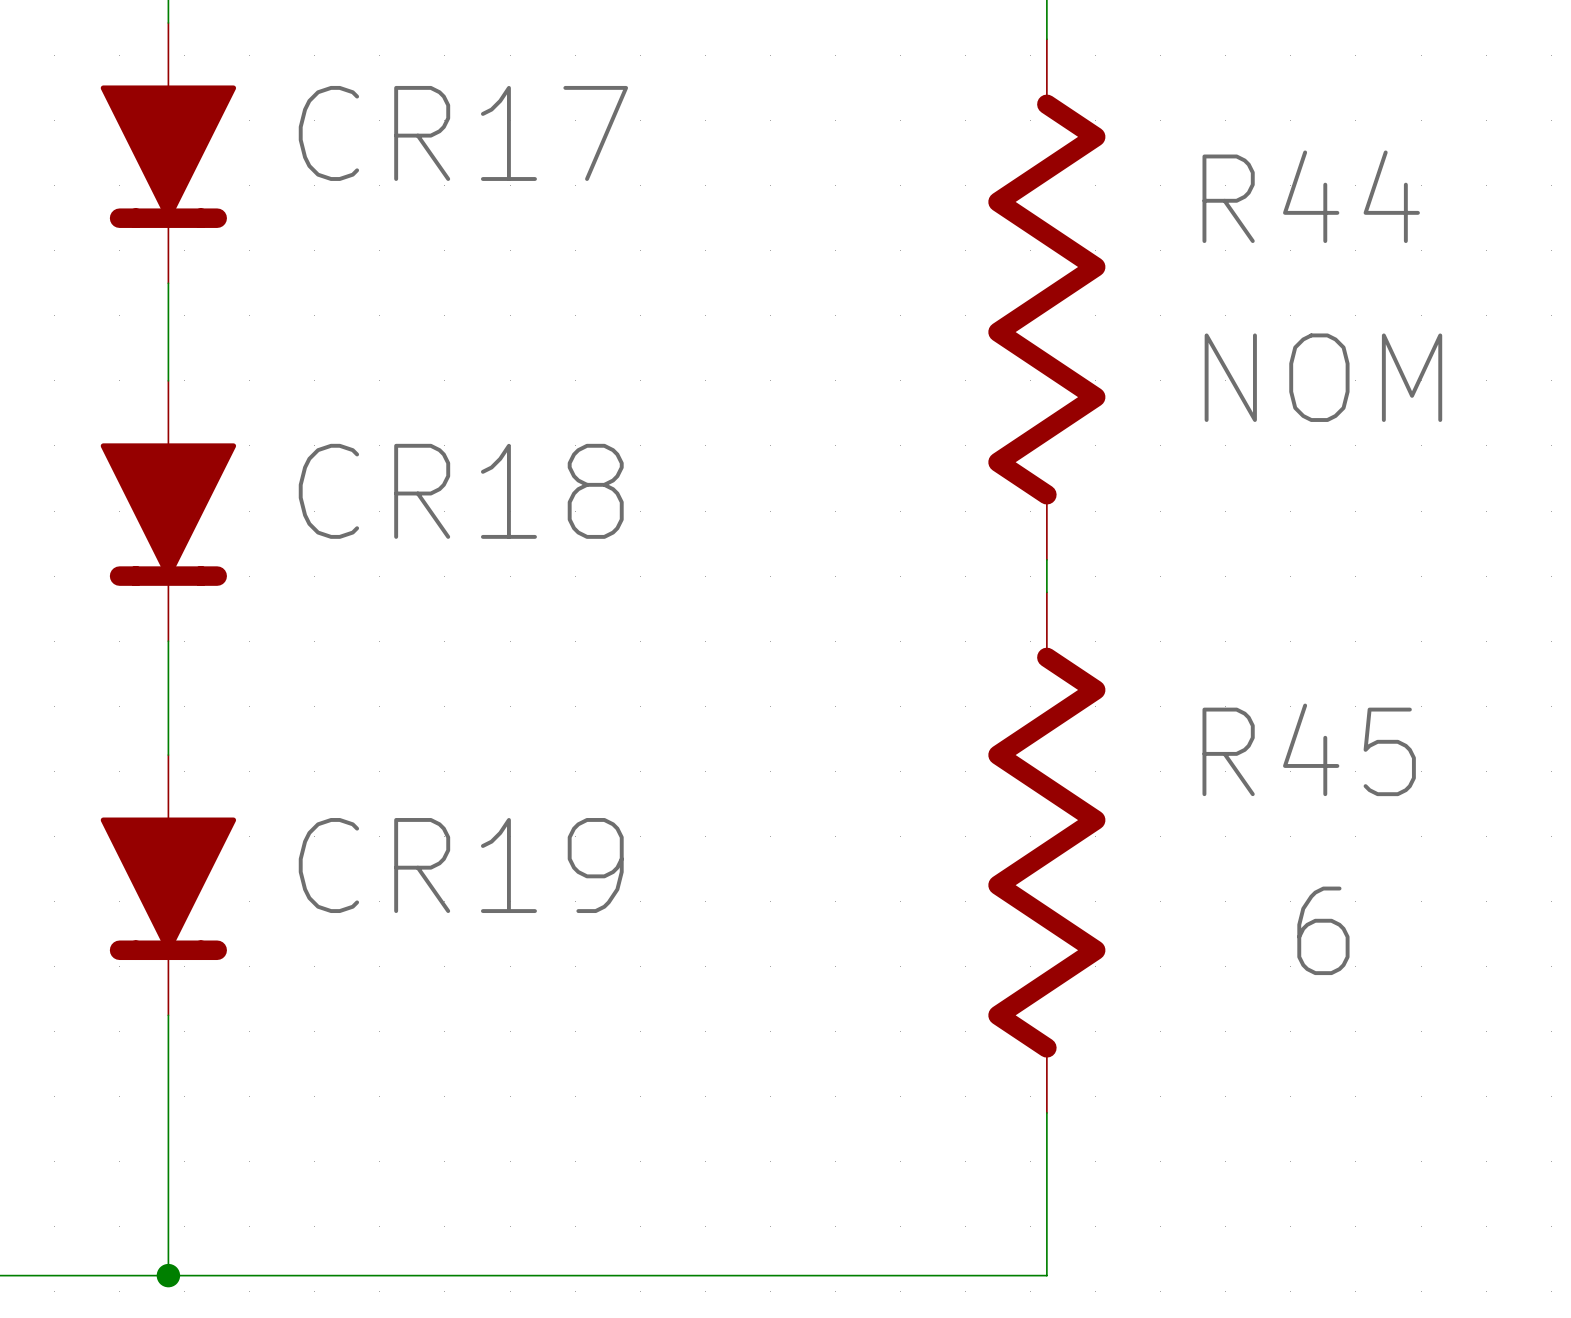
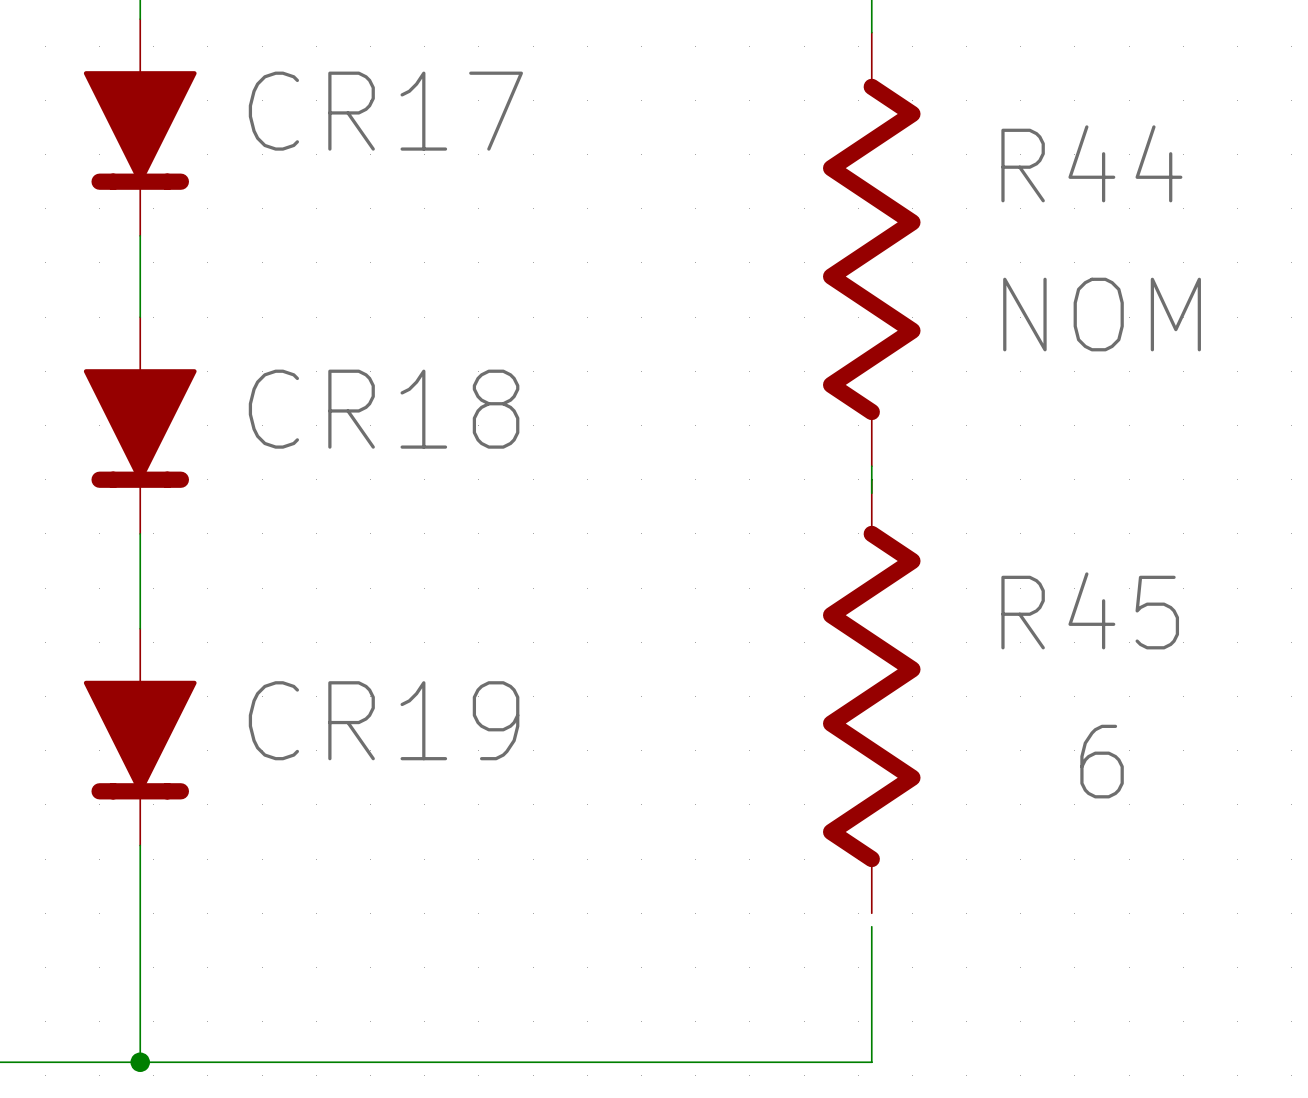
R45 position: (1046, 852) -> (871, 696)

